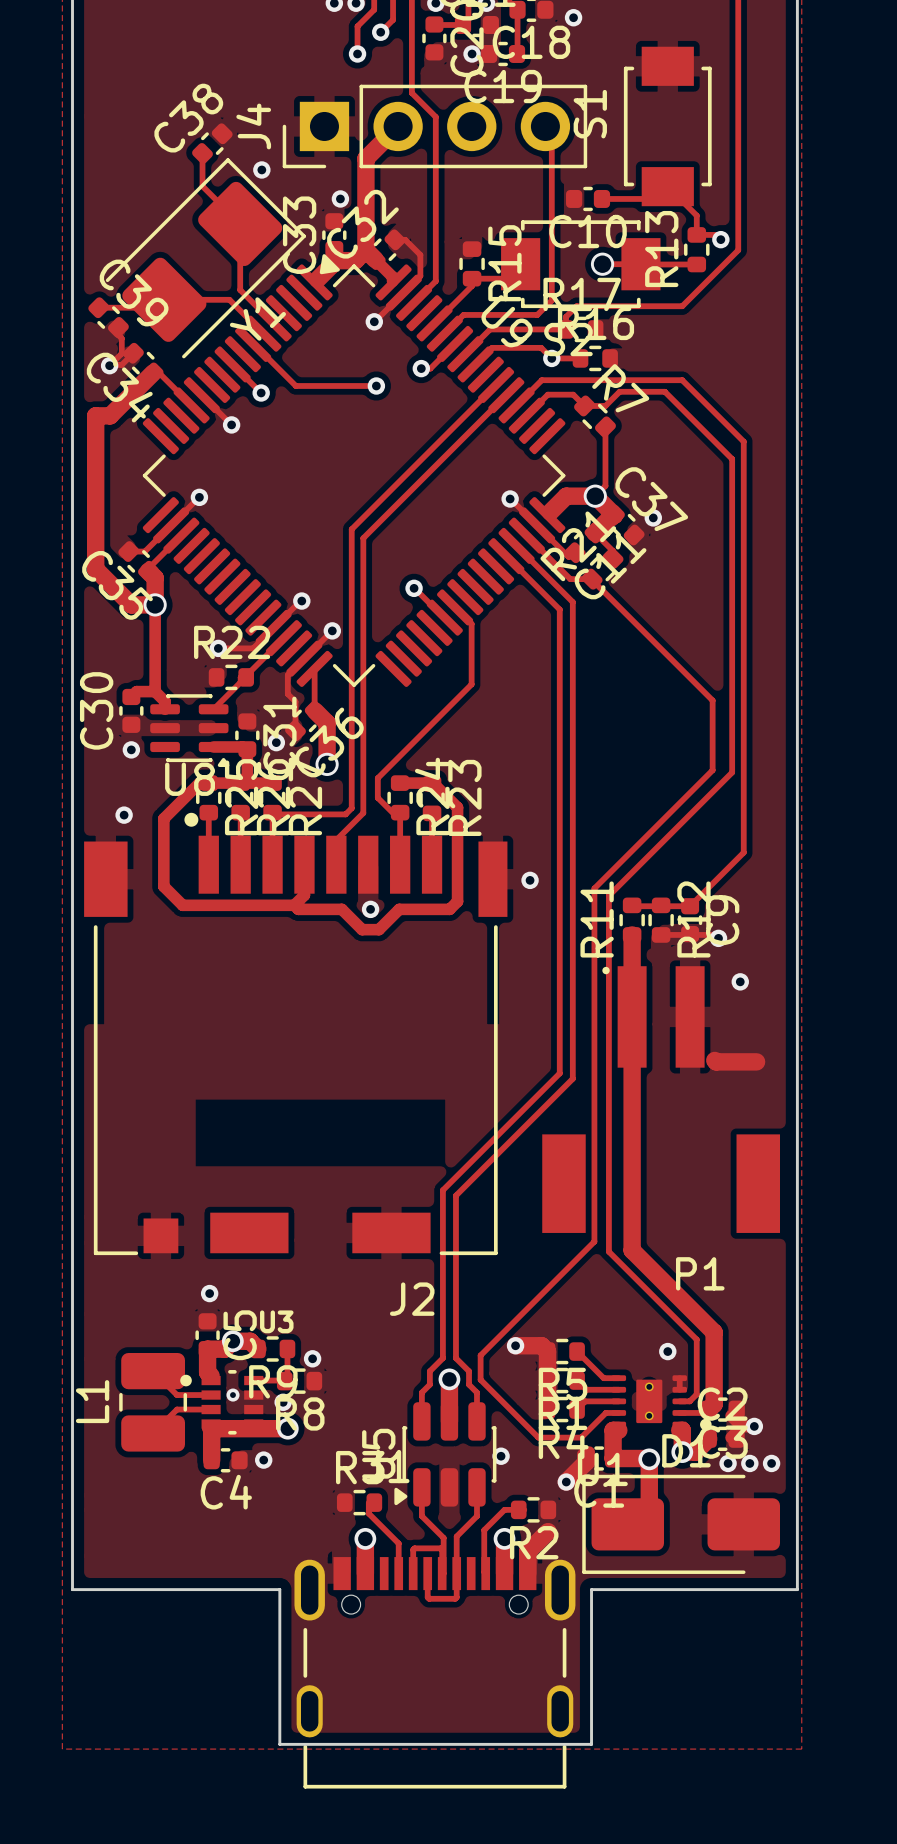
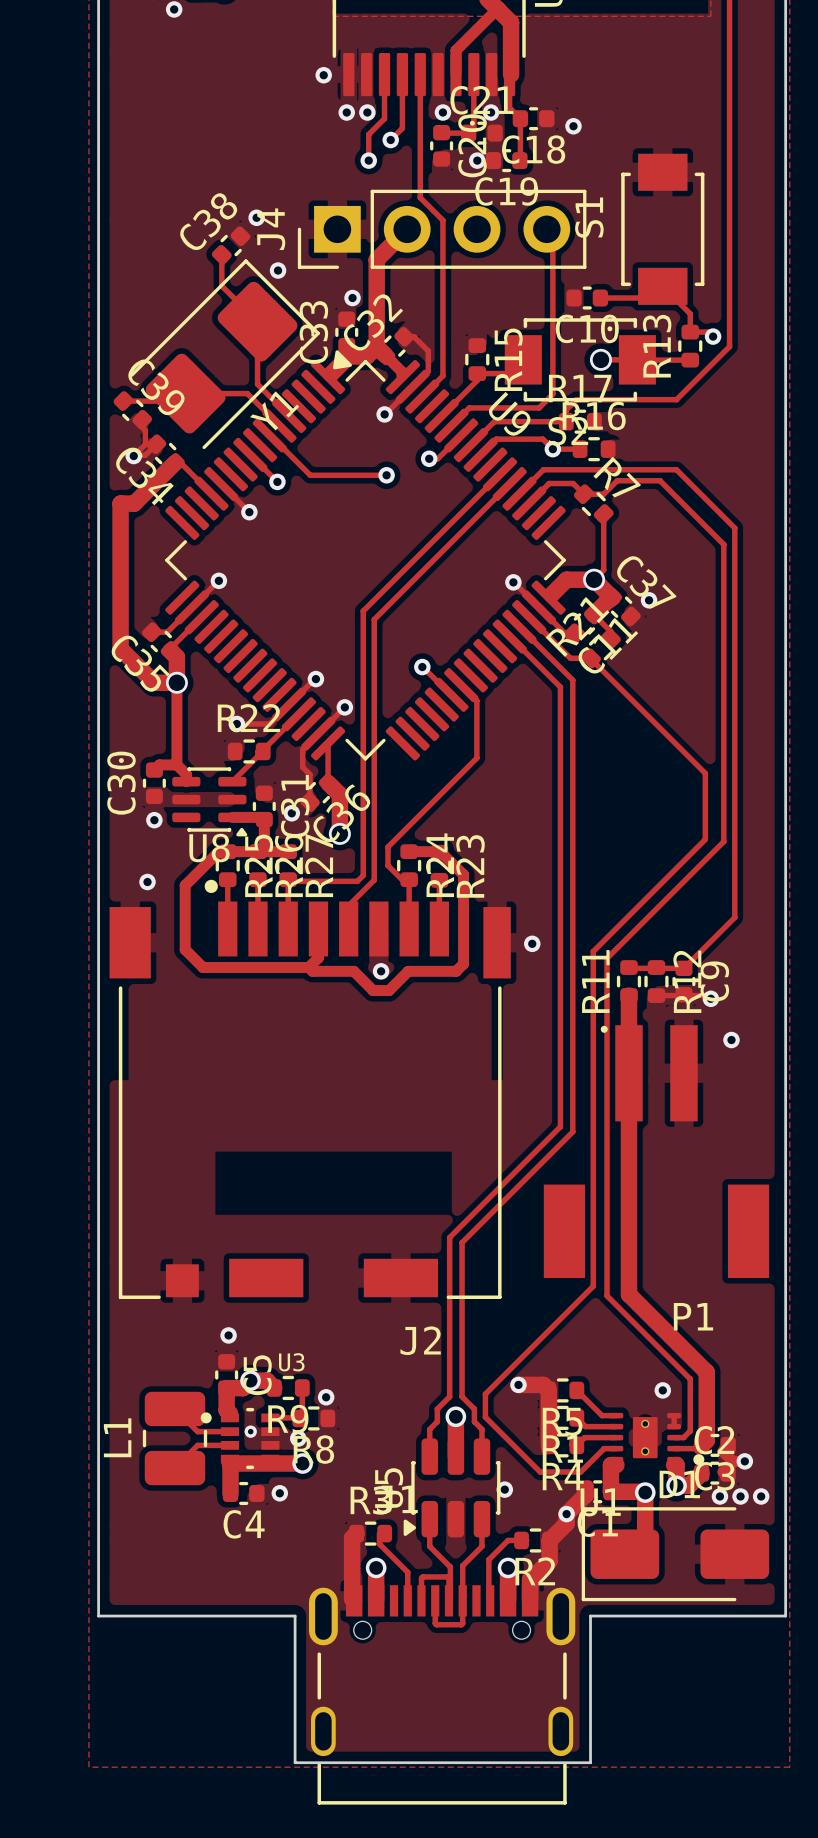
via: none -> (256, 217)
track: (714, 1060) (756, 1061) -> none
track: none -> (566, 1514) (566, 1523) (549, 1540) (549, 1560)
track: none -> (356, 1533) (352, 1538) (352, 1598) (354, 1600)

